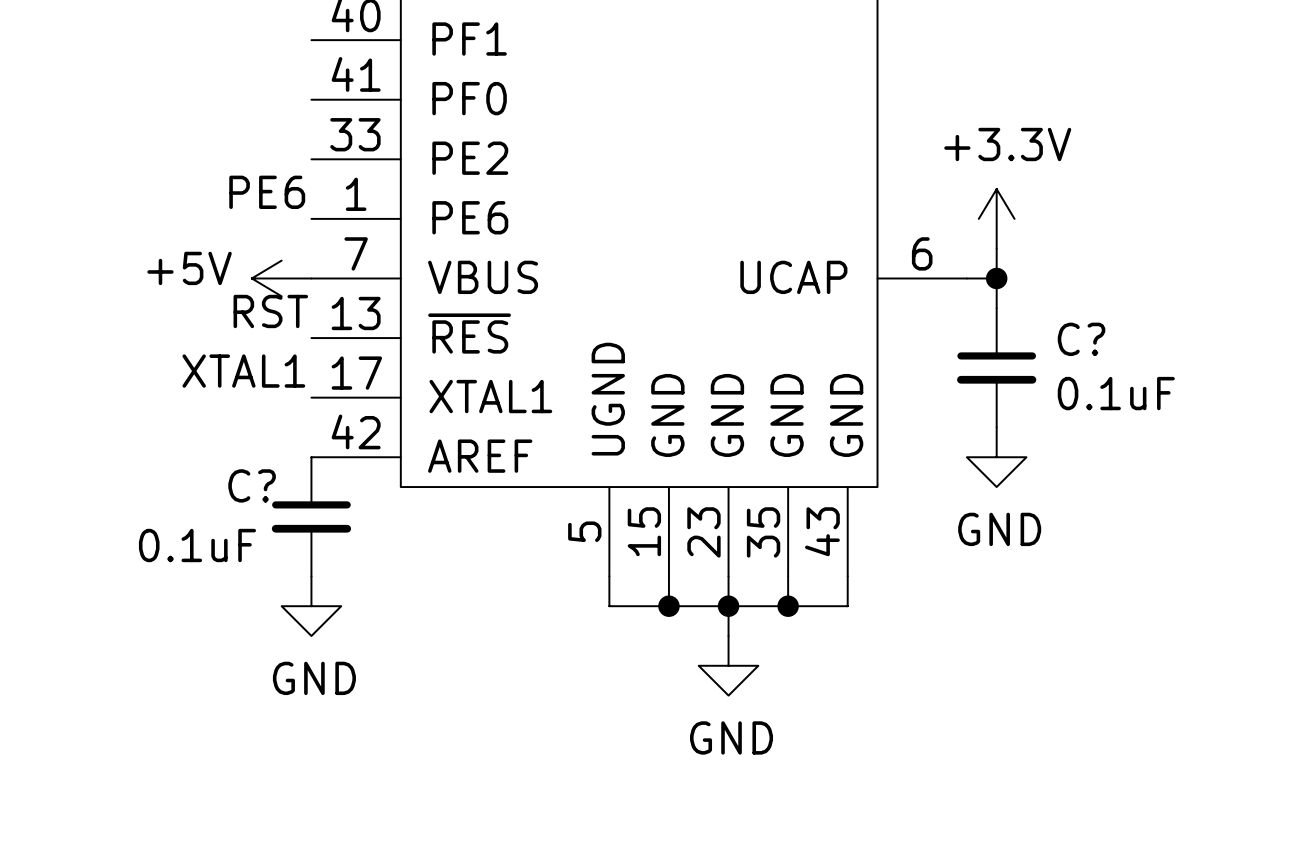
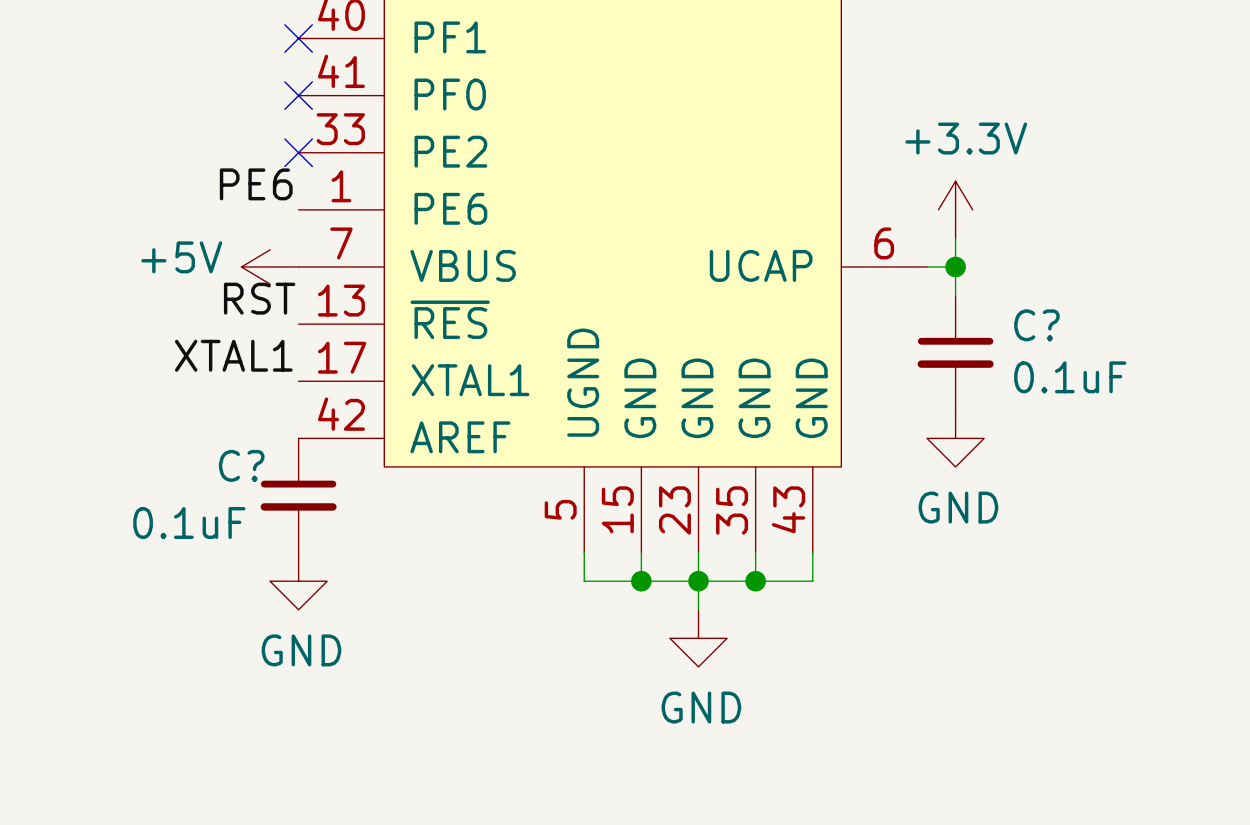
no-connect mark: none -> (298, 38)
no-connect mark: none -> (298, 95)
no-connect mark: none -> (298, 152)

